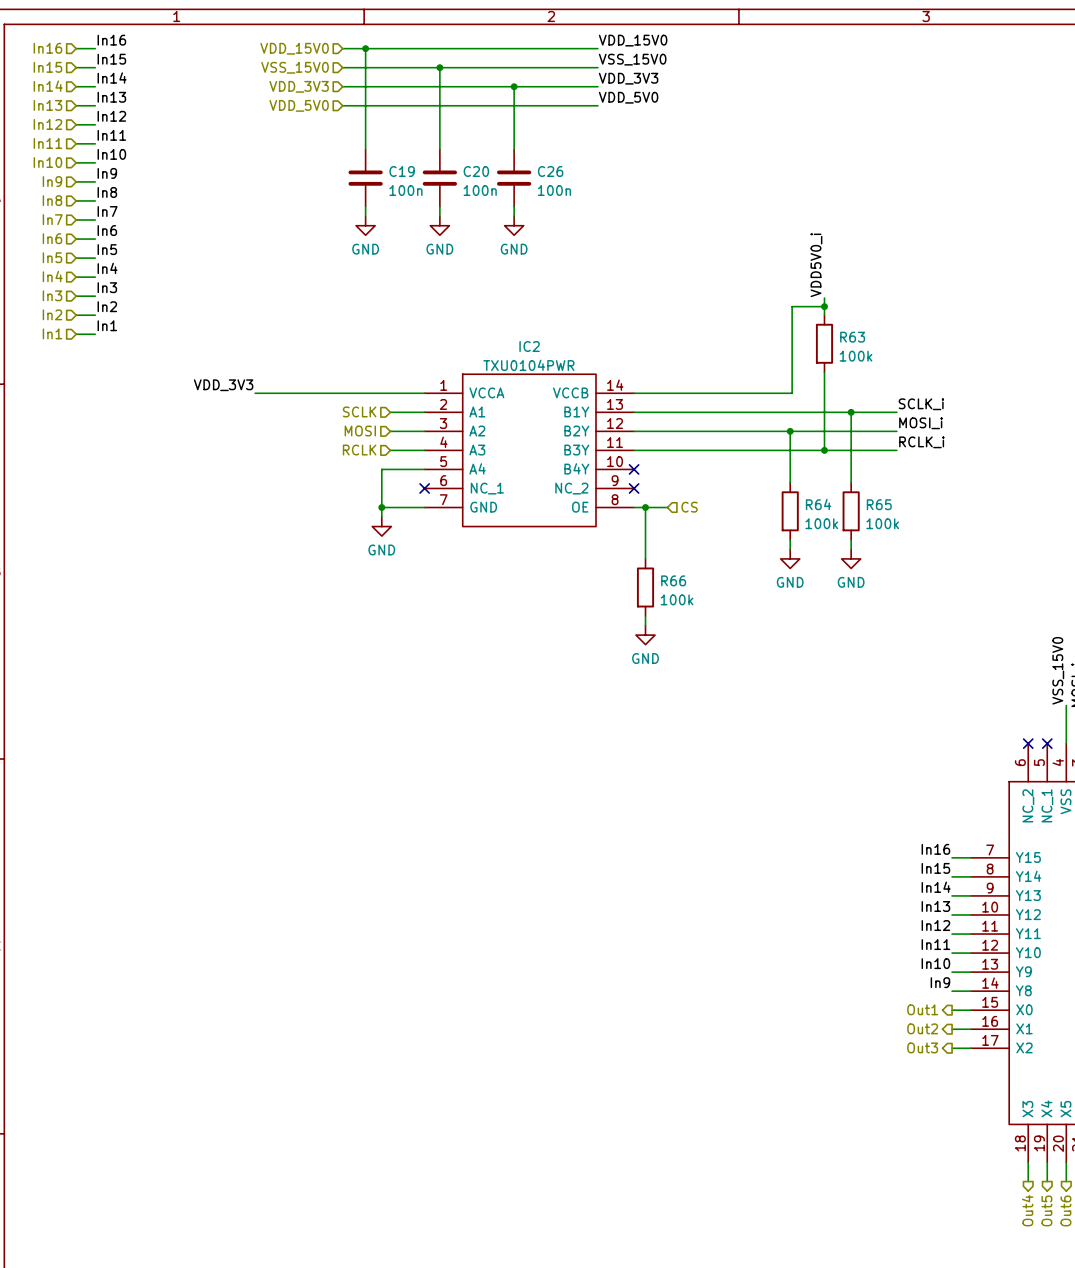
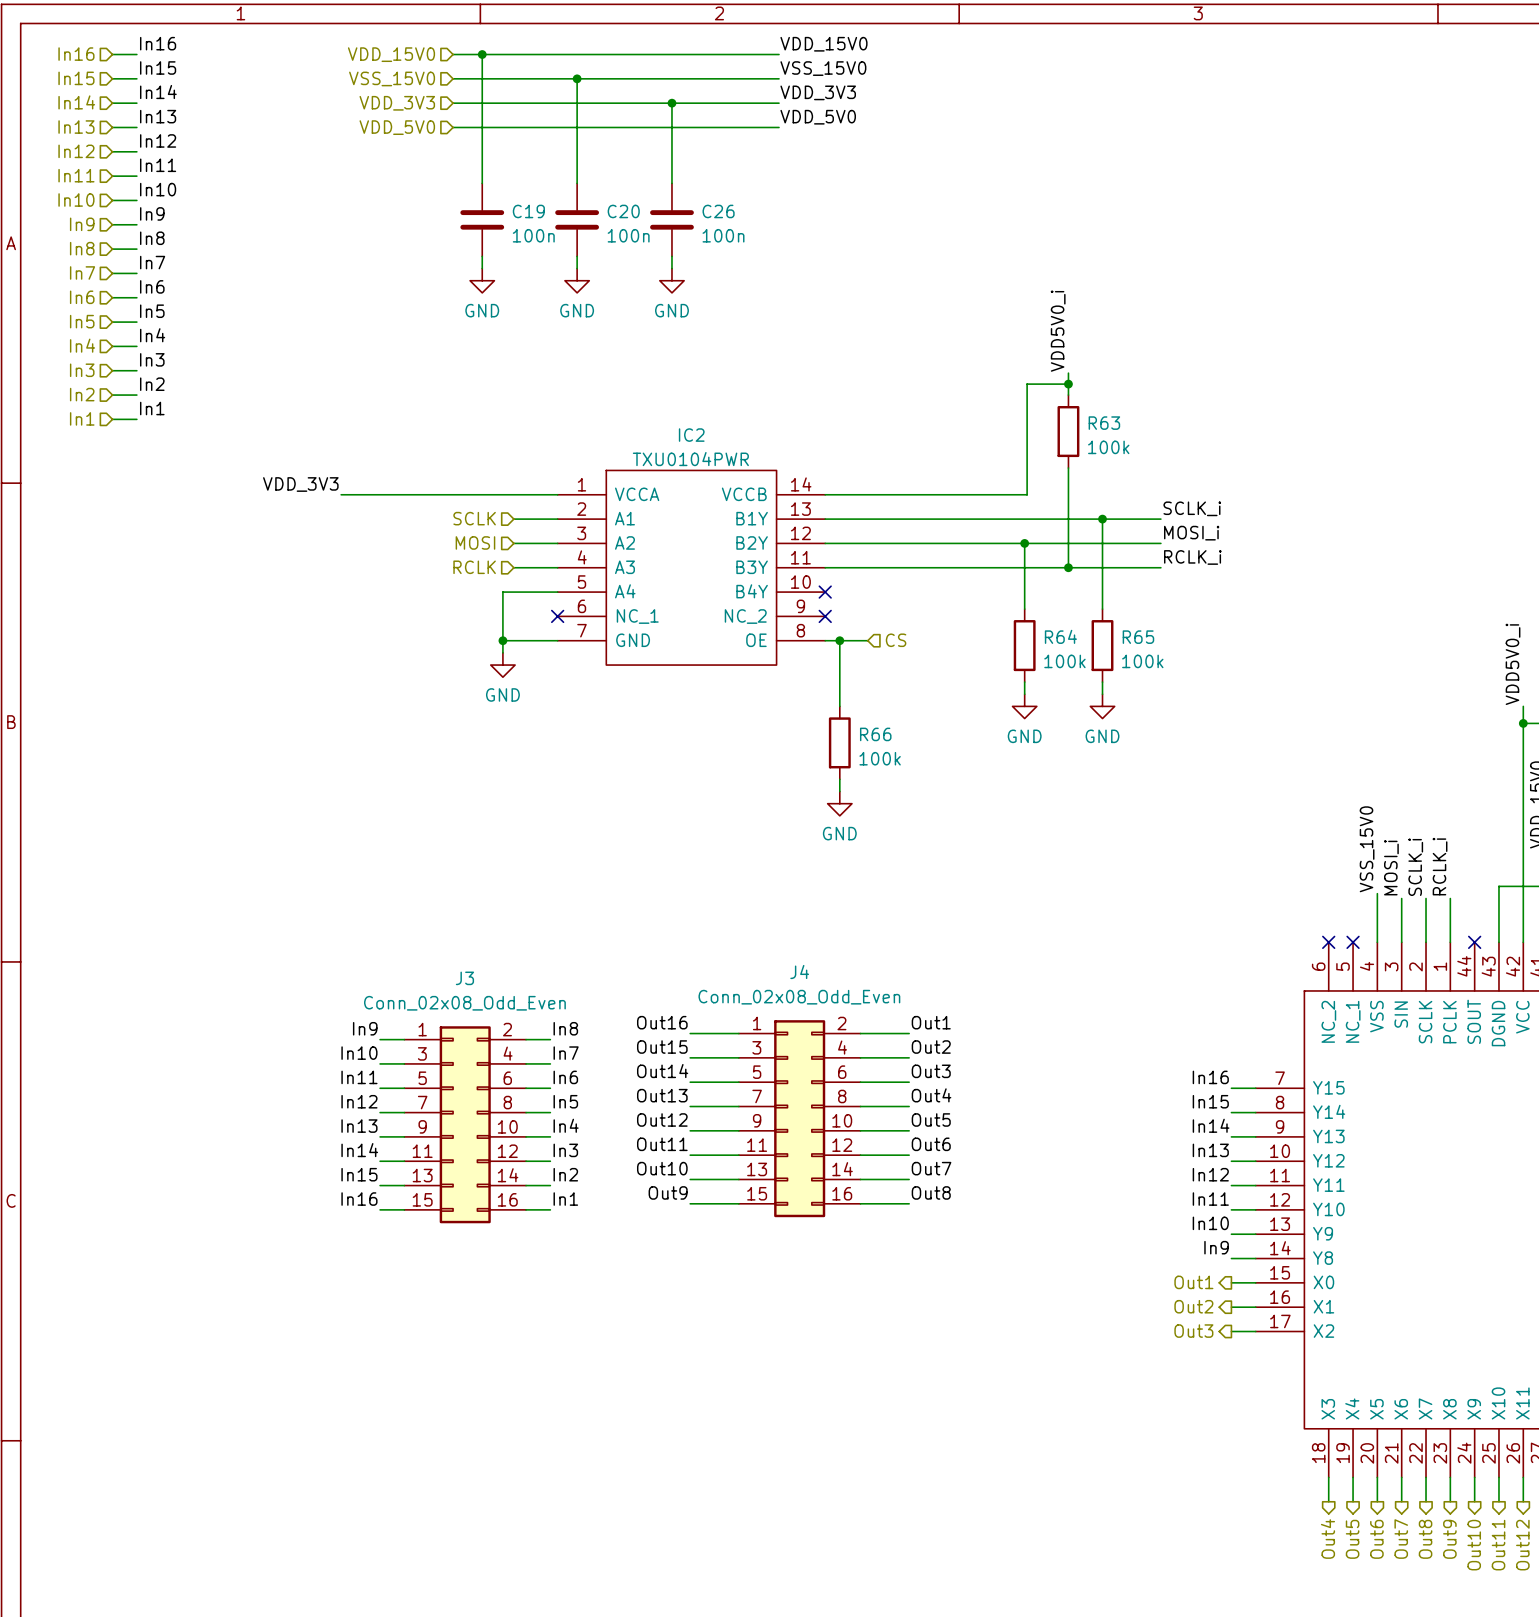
label: none -> Out16 (662, 1022)
label: none -> Out1 (931, 1022)
label: none -> In9 (365, 1028)
label: none -> In8 (565, 1028)
wire: none -> (690, 1033) (738, 1033)
wire: none -> (860, 1033) (909, 1033)
wire: none -> (380, 1039) (404, 1039)
wire: none -> (526, 1039) (550, 1039)
label: none -> Out15 (662, 1047)
label: none -> Out2 (931, 1047)
label: none -> In10 (359, 1053)
label: none -> In7 (566, 1053)
wire: none -> (690, 1057) (738, 1057)
wire: none -> (860, 1057) (909, 1057)
wire: none -> (380, 1063) (404, 1063)
wire: none -> (526, 1063) (550, 1063)
label: none -> Out14 (662, 1071)
label: none -> Out3 (931, 1071)
label: none -> In11 (359, 1077)
label: none -> In6 (565, 1077)
wire: none -> (690, 1082) (738, 1082)
wire: none -> (860, 1082) (909, 1082)
wire: none -> (380, 1088) (404, 1088)
wire: none -> (526, 1088) (550, 1088)
label: none -> Out13 (662, 1095)
label: none -> Out4 (931, 1095)
label: none -> In12 (359, 1101)
label: none -> In5 (565, 1101)
wire: none -> (690, 1106) (738, 1106)
wire: none -> (860, 1106) (909, 1106)
wire: none -> (380, 1112) (404, 1112)
wire: none -> (526, 1112) (550, 1112)
J4: none -> Conn_02x08_Odd_Even (799, 1118)
label: none -> Out12 (662, 1119)
label: none -> Out5 (931, 1119)
J3: none -> Conn_02x08_Odd_Even (465, 1124)
label: none -> In13 (359, 1126)
label: none -> In4 (566, 1125)
wire: none -> (690, 1130) (738, 1130)
wire: none -> (860, 1130) (909, 1130)
wire: none -> (380, 1136) (404, 1136)
wire: none -> (526, 1136) (550, 1136)
label: none -> Out11 (662, 1144)
label: none -> Out6 (931, 1144)
label: none -> In14 (359, 1150)
label: none -> In3 (565, 1150)
wire: none -> (690, 1155) (738, 1155)
wire: none -> (860, 1155) (909, 1155)
wire: none -> (380, 1161) (404, 1161)
wire: none -> (526, 1161) (550, 1161)
label: none -> Out10 (662, 1168)
label: none -> Out7 (931, 1168)
label: none -> In15 (359, 1174)
label: none -> In2 (565, 1174)
wire: none -> (690, 1179) (738, 1179)
wire: none -> (860, 1179) (909, 1179)
wire: none -> (380, 1185) (404, 1185)
wire: none -> (526, 1185) (550, 1185)
label: none -> Out9 (668, 1192)
label: none -> Out8 (931, 1192)
label: none -> In16 (359, 1199)
label: none -> In1 (565, 1199)
wire: none -> (690, 1203) (738, 1203)
wire: none -> (860, 1203) (909, 1203)
wire: none -> (380, 1209) (404, 1209)
wire: none -> (526, 1209) (550, 1209)

